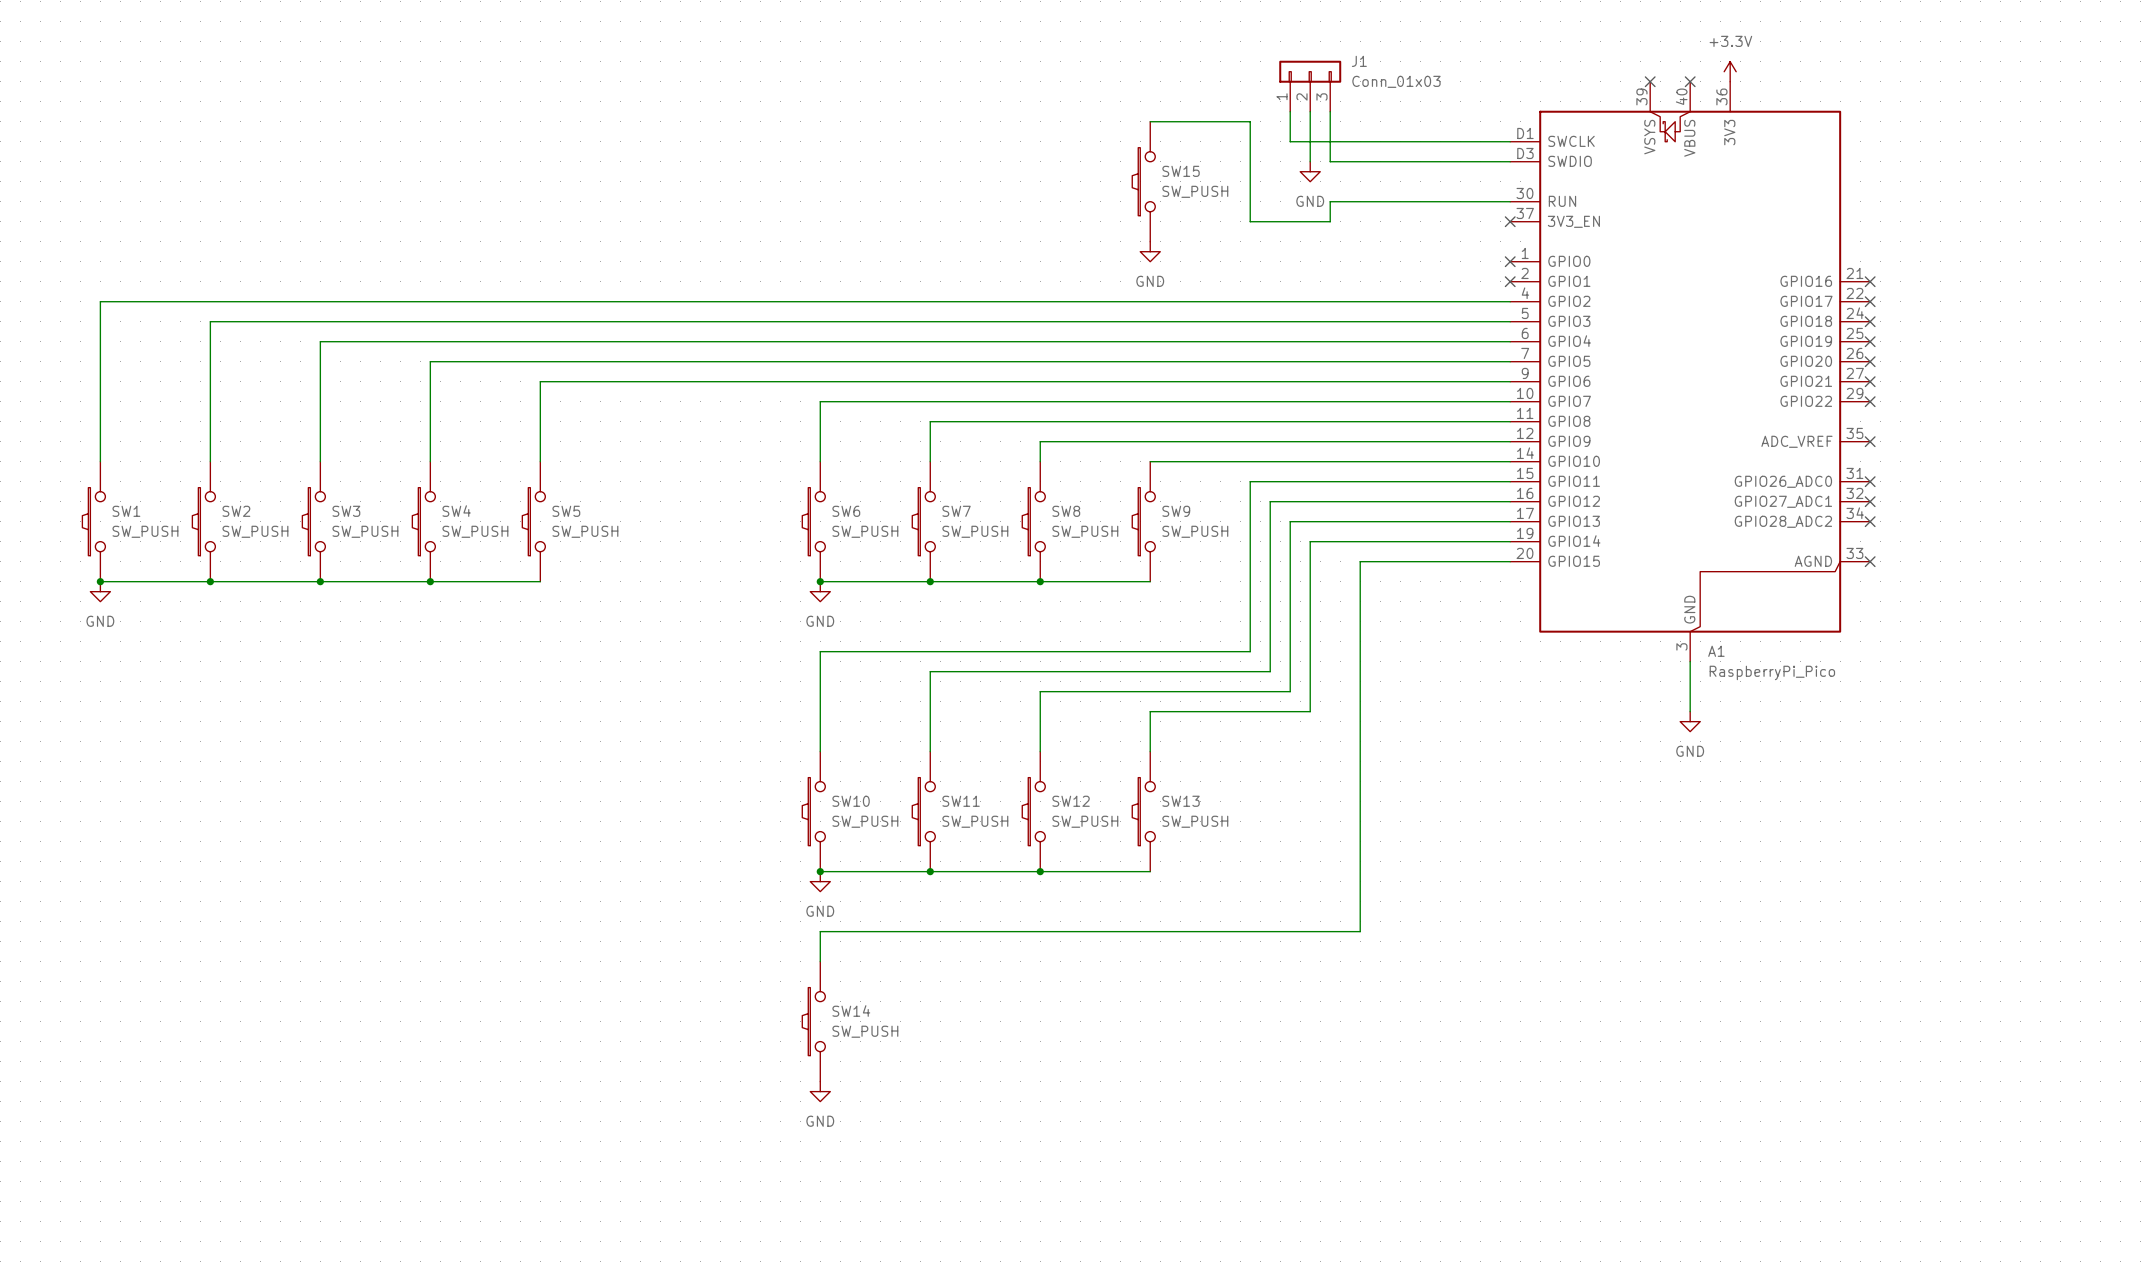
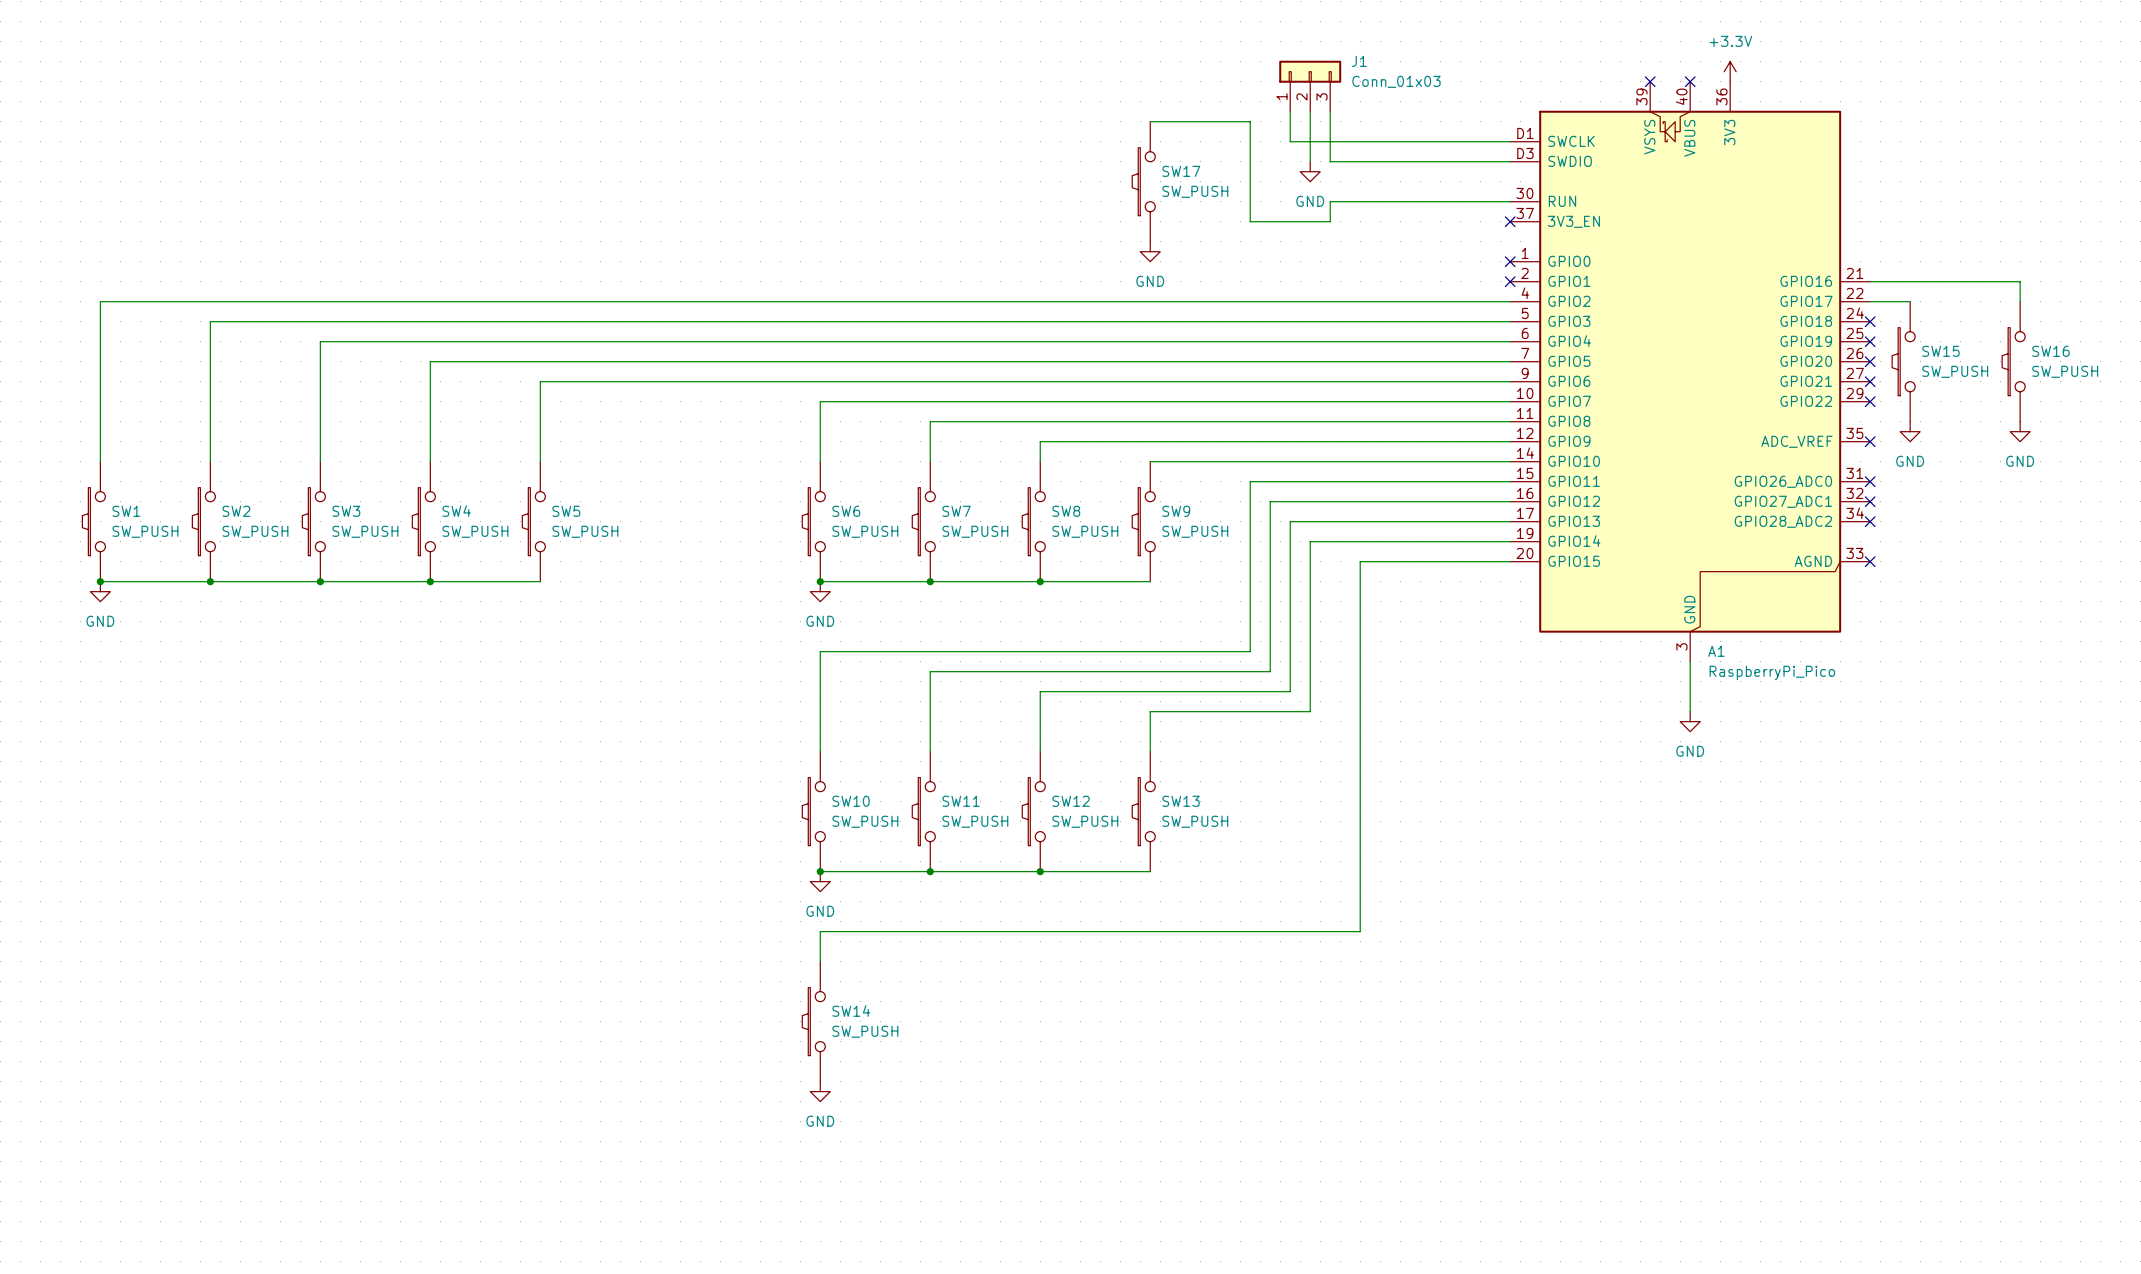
SW15 name: SW15 (1181, 171) -> SW17 (1181, 171)
wire: none -> (1870, 281) (2020, 281) (2020, 301)
no-connect mark: (1870, 281) -> none
wire: none -> (1870, 301) (1910, 301)
no-connect mark: (1870, 301) -> none
SW15: none -> SW_PUSH (1903, 361)
SW16: none -> SW_PUSH (2013, 361)
power symbol: none -> GND (1910, 431)
power symbol: none -> GND (2020, 431)

